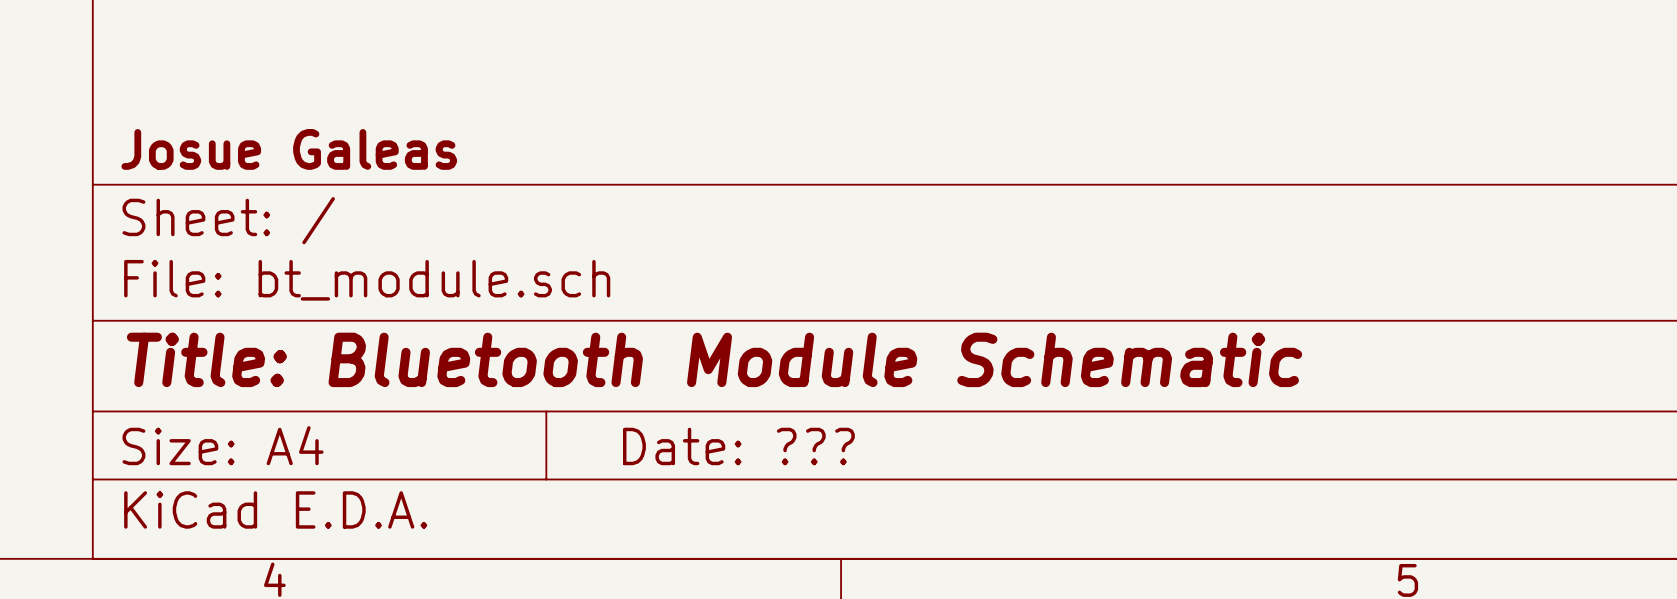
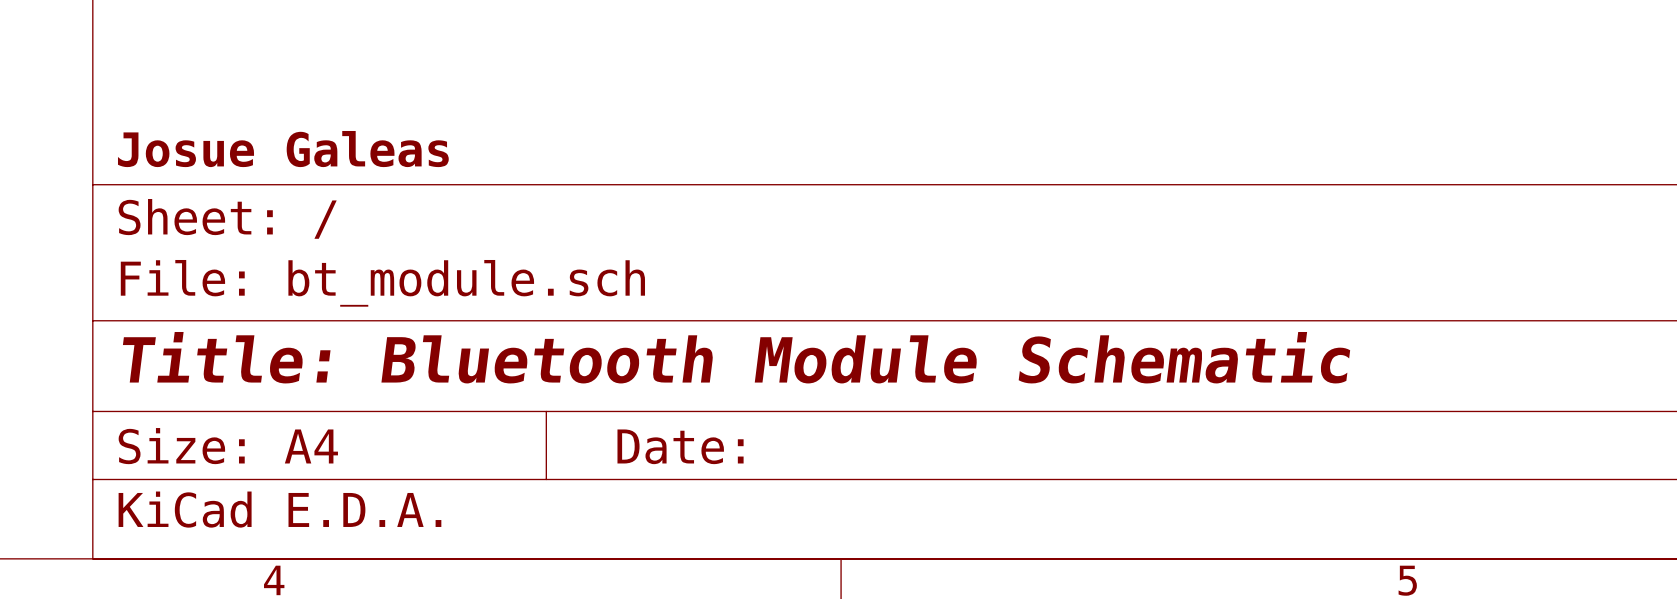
title block: Date: ??? (738, 446) -> Date: (680, 446)

